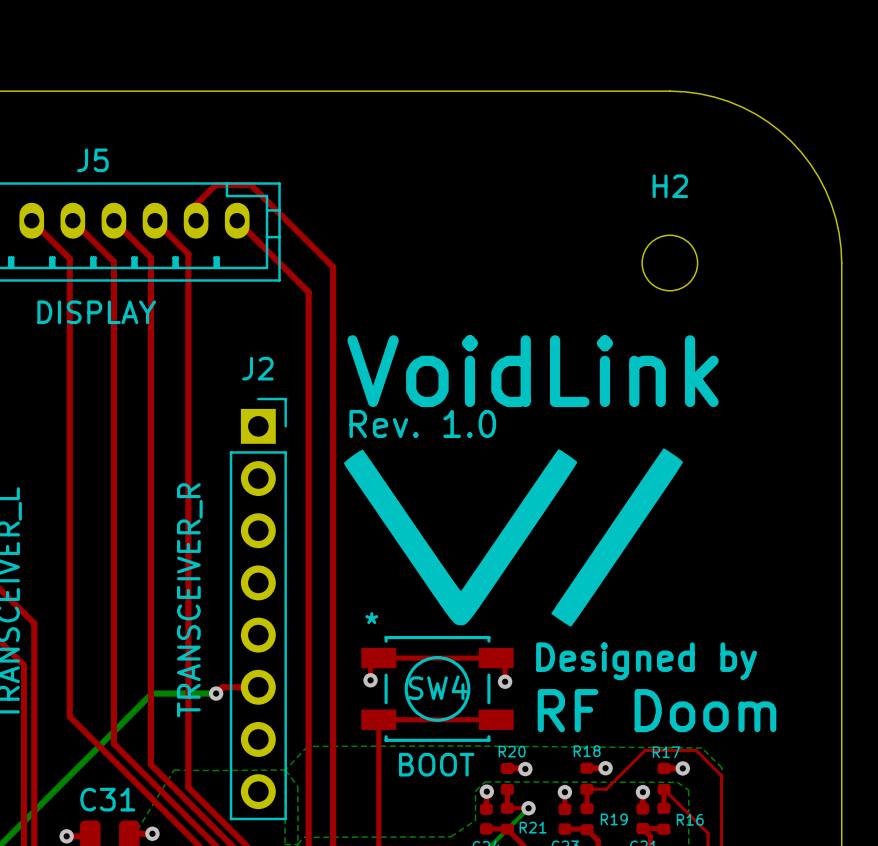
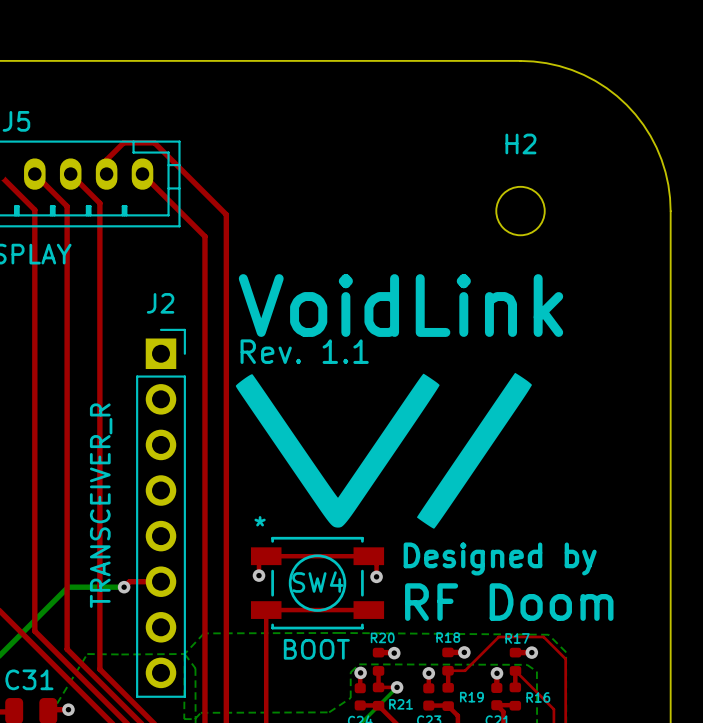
text: Rev. 1.0 (422, 423) -> Rev. 1.1 (304, 351)

